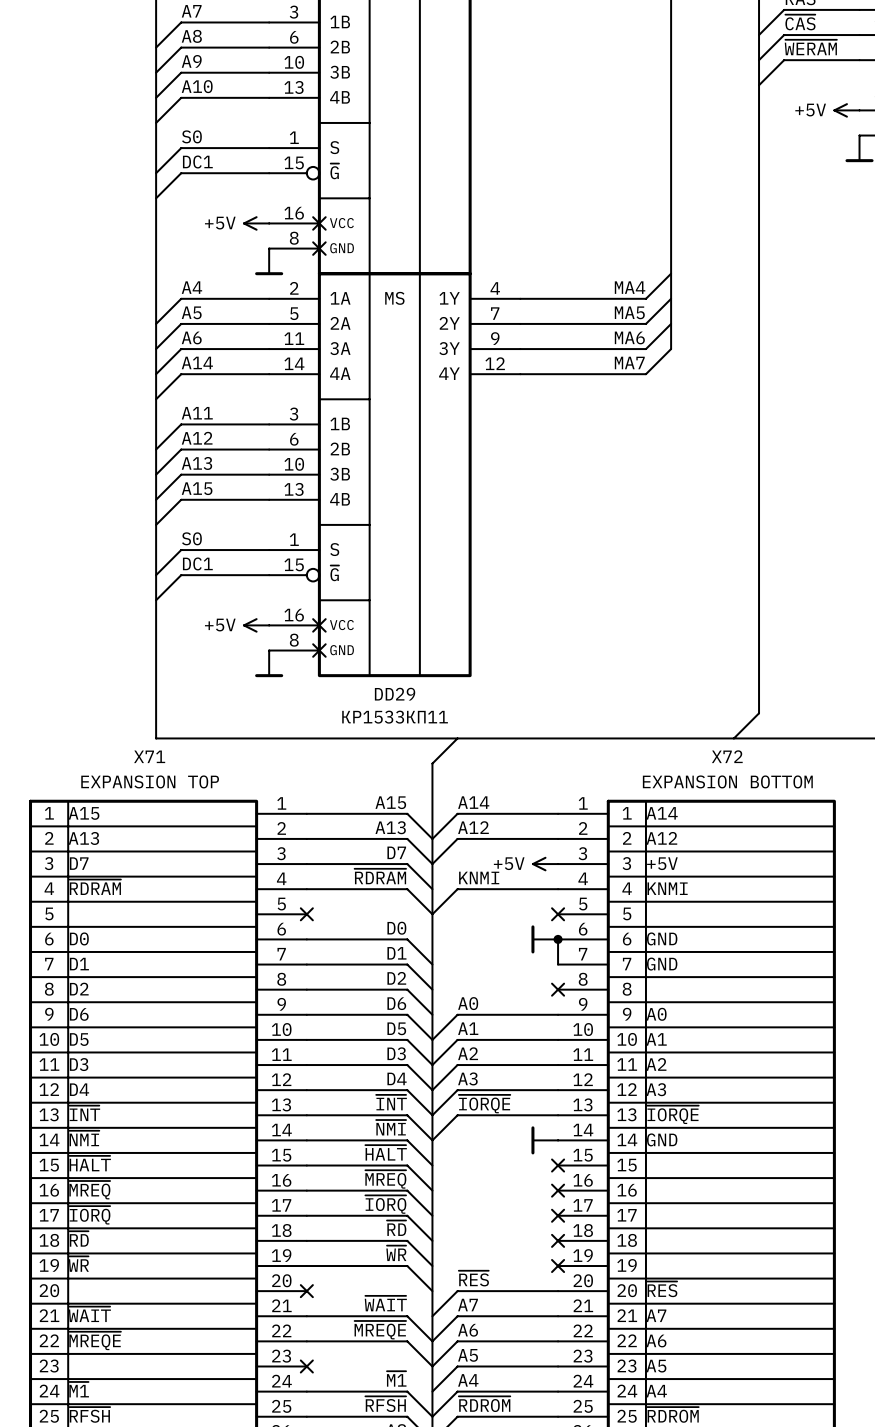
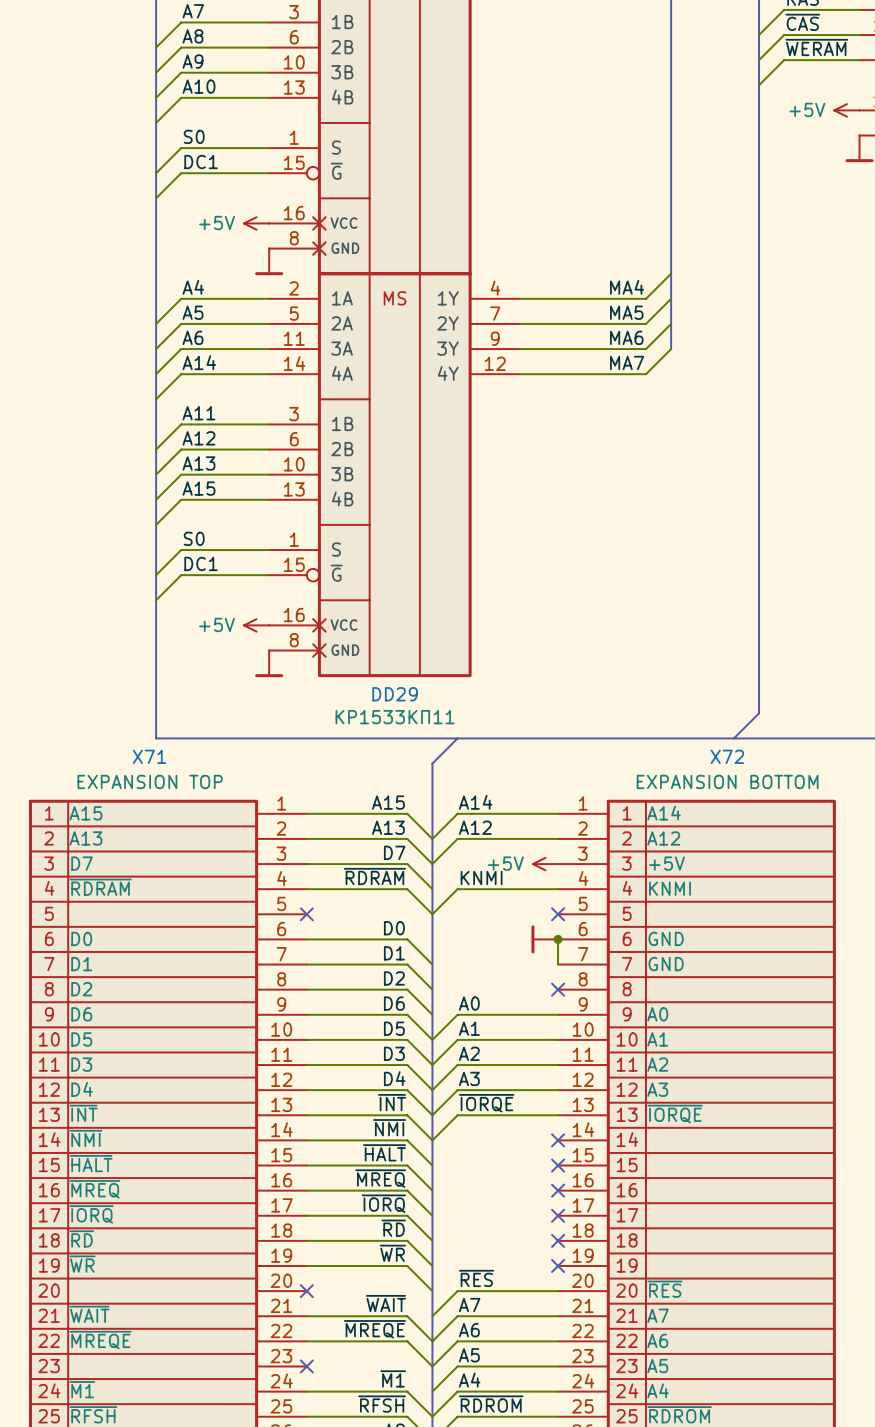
X72 text: GND (662, 1139) -> none
power symbol: (544, 1140) -> none
no-connect mark: none -> (558, 1140)

